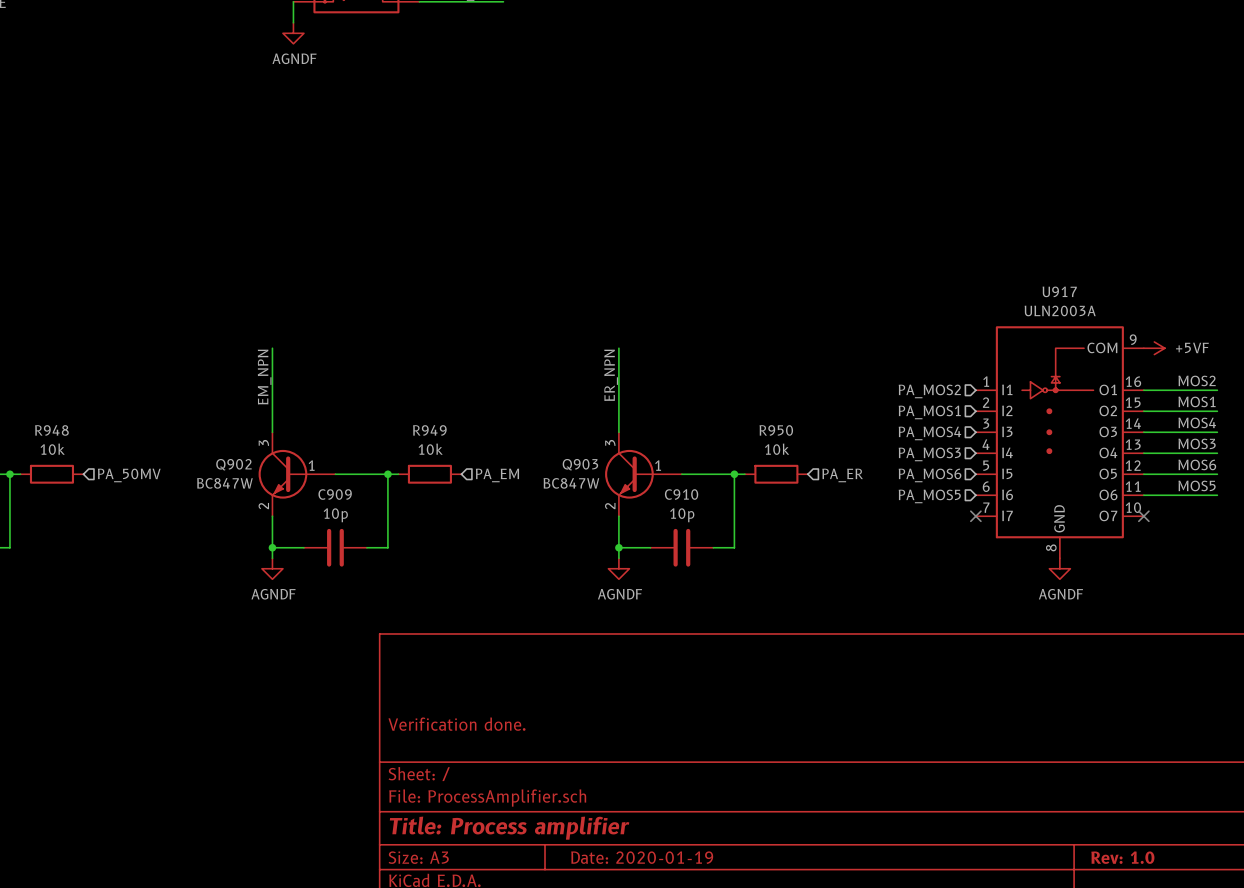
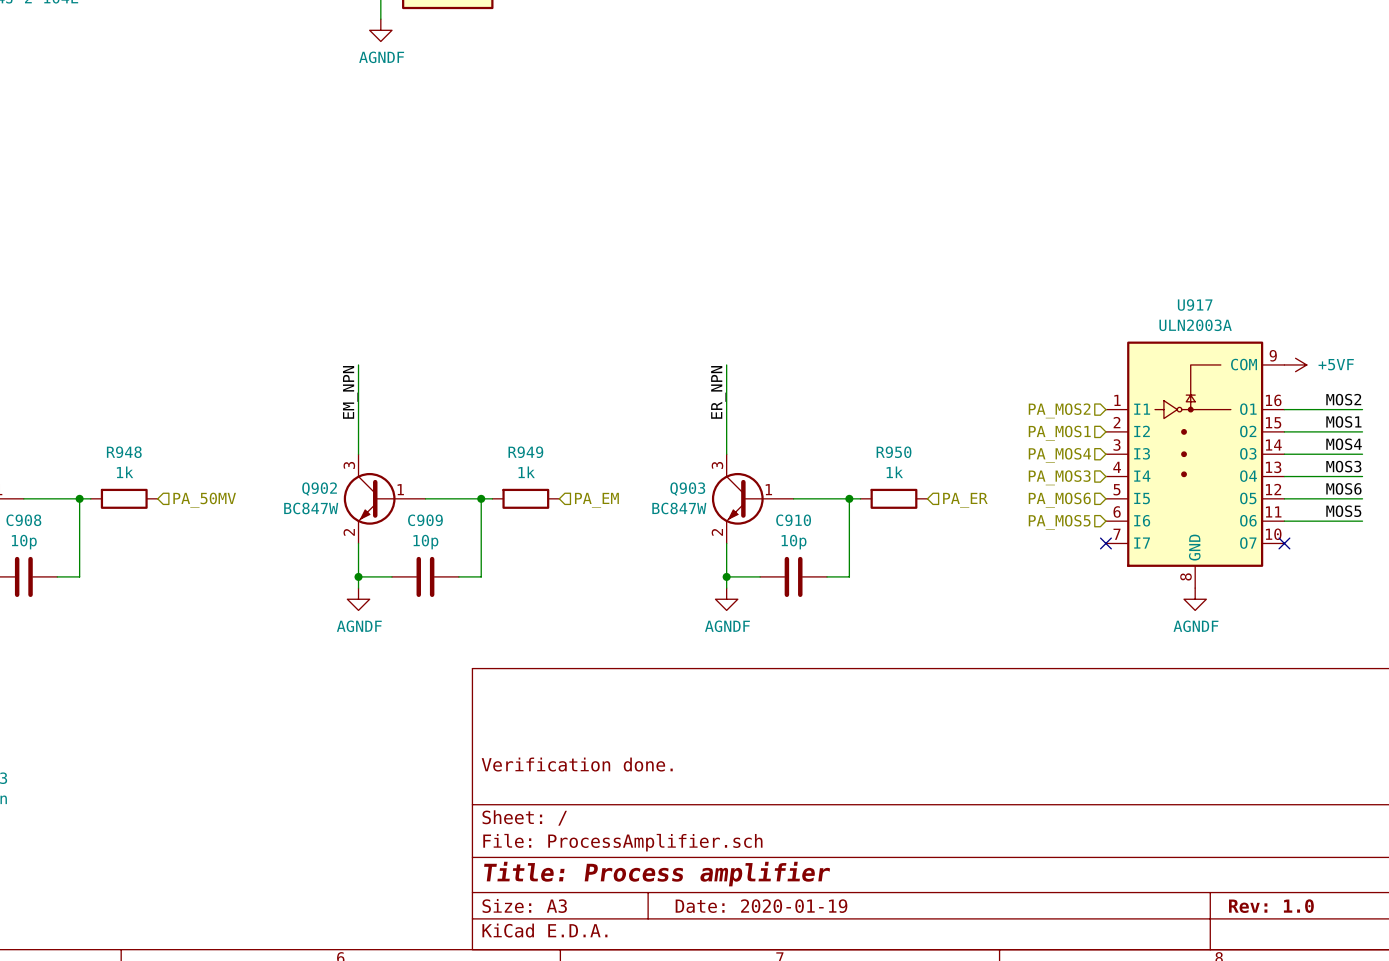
R948 value: 10k (52, 449) -> 1k (125, 472)
R949 value: 10k (430, 449) -> 1k (526, 472)
R950 value: 10k (777, 449) -> 1k (894, 472)

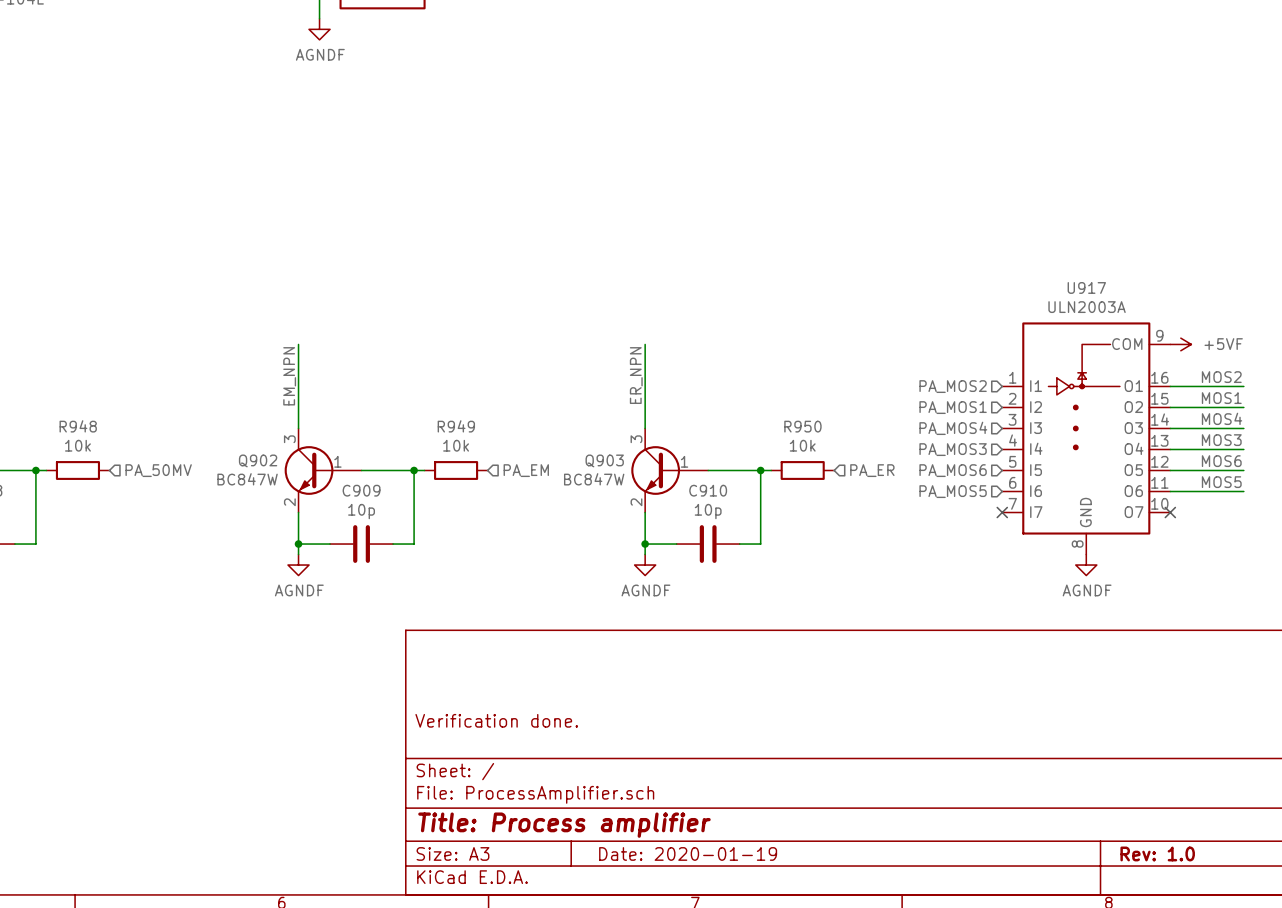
R948 value: 1k (125, 472) -> 10k (77, 445)
R949 value: 1k (526, 472) -> 10k (456, 445)
R950 value: 1k (894, 472) -> 10k (802, 445)

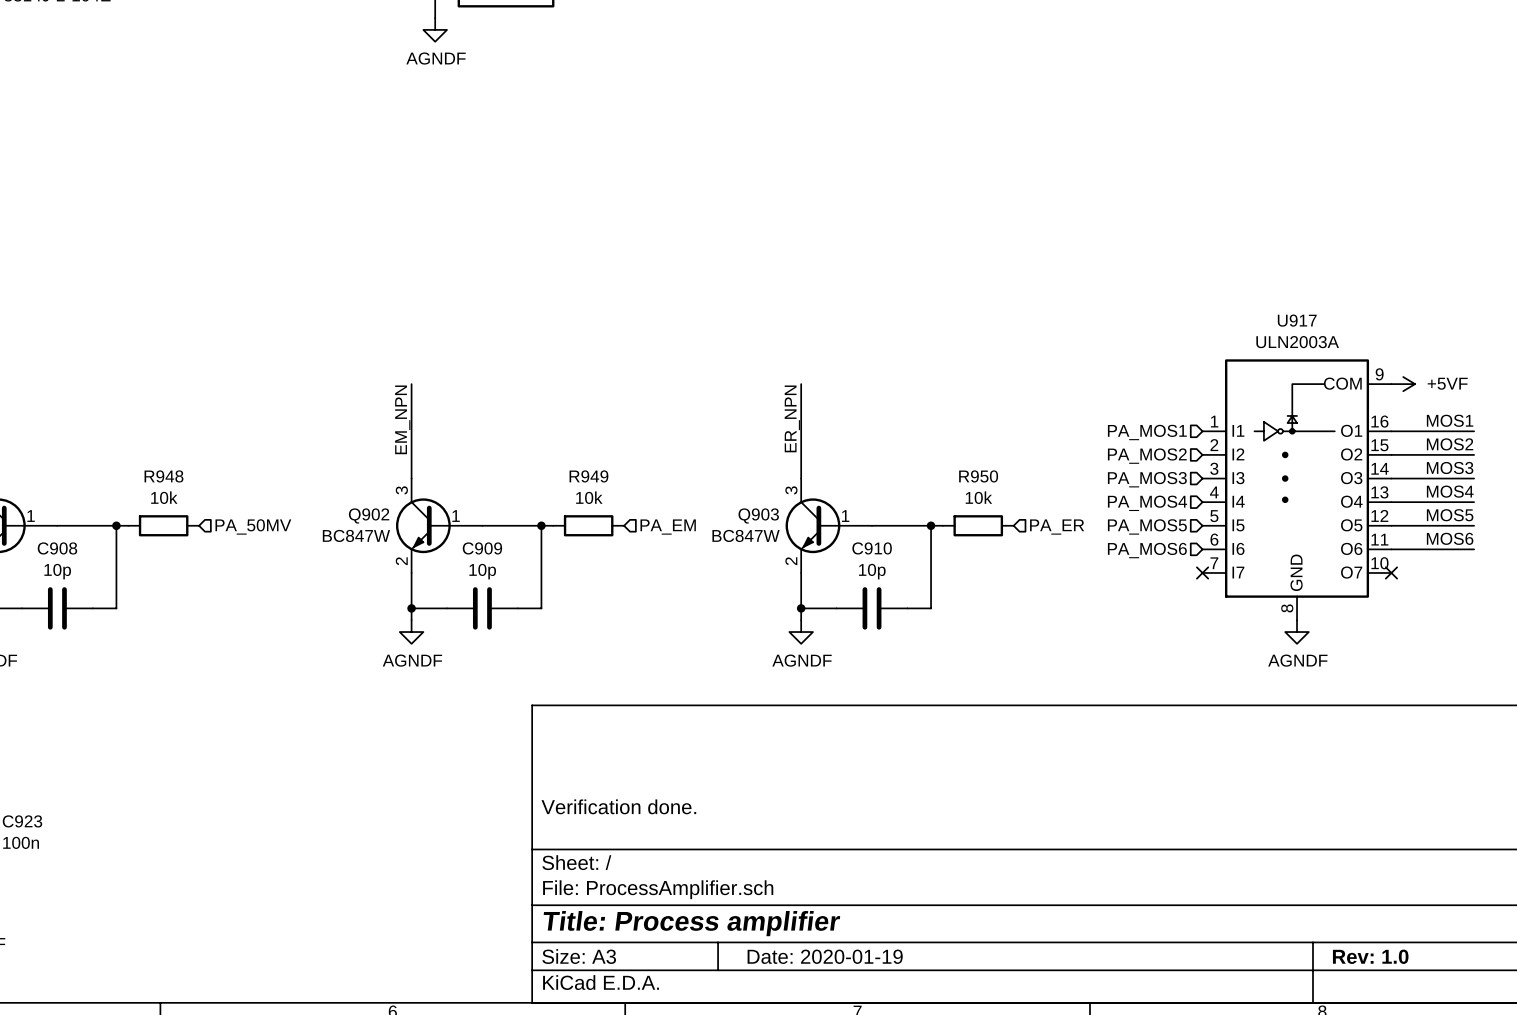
label: MOS2 (1221, 377) -> MOS1 (1450, 420)
hierarchical label: PA_MOS2 (953, 386) -> PA_MOS1 (1147, 432)
label: MOS1 (1221, 398) -> MOS2 (1450, 444)
hierarchical label: PA_MOS1 (953, 407) -> PA_MOS2 (1147, 456)
label: MOS4 (1222, 418) -> MOS3 (1450, 468)
hierarchical label: PA_MOS4 (953, 428) -> PA_MOS3 (1147, 479)
label: MOS3 (1221, 440) -> MOS4 (1450, 491)
hierarchical label: PA_MOS3 (953, 449) -> PA_MOS4 (1147, 503)
label: MOS6 (1221, 461) -> MOS5 (1450, 515)
hierarchical label: PA_MOS6 (953, 470) -> PA_MOS5 (1147, 526)
label: MOS5 (1221, 482) -> MOS6 (1450, 538)
hierarchical label: PA_MOS5 (953, 491) -> PA_MOS6 (1147, 550)

